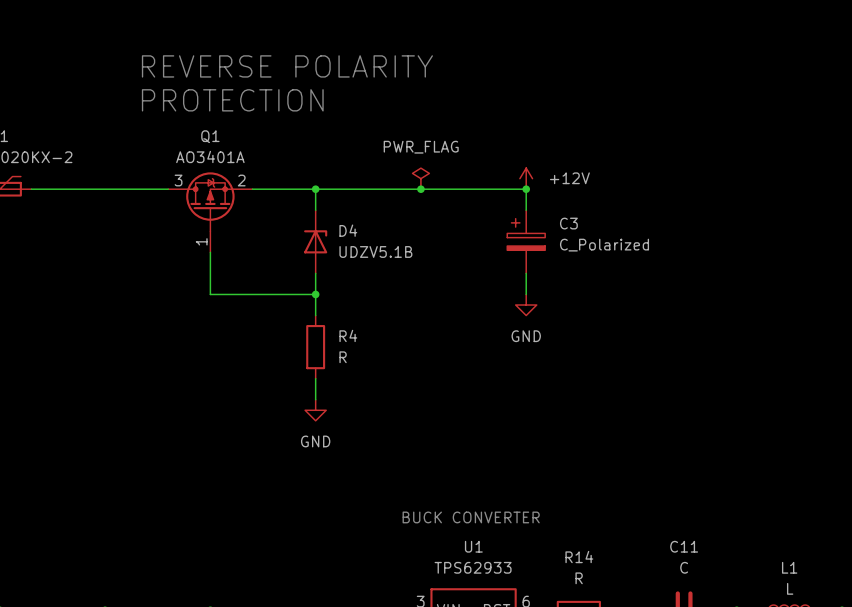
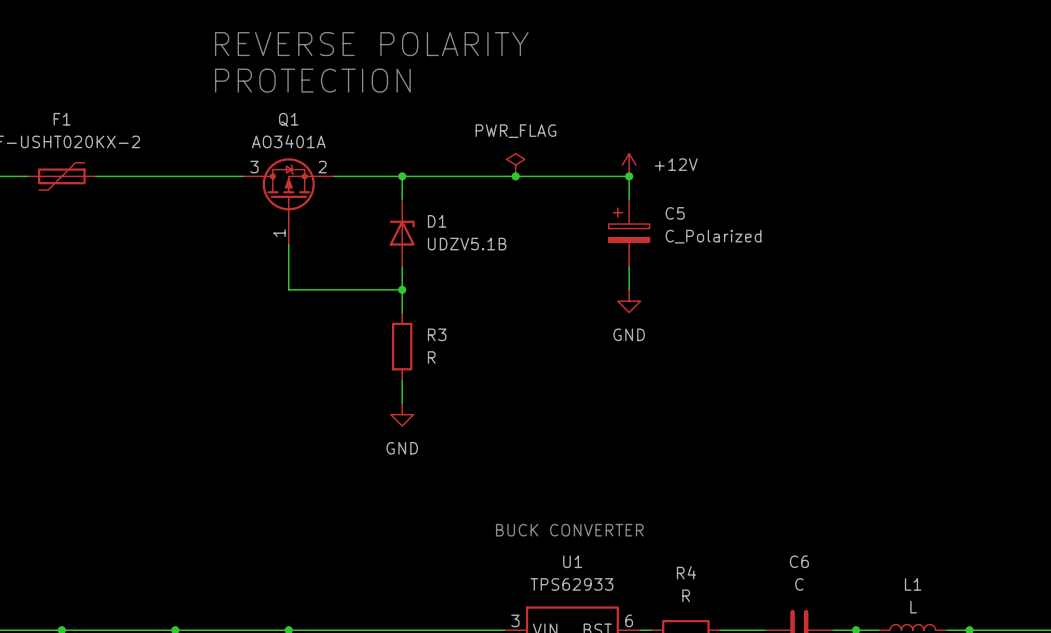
C3 name: C3 (568, 223) -> C5 (675, 213)
D4 name: D4 (348, 230) -> D1 (437, 221)
R4 name: R4 (348, 335) -> R3 (437, 334)
C11 name: C11 (684, 546) -> C6 (799, 561)
R14 name: R14 (579, 557) -> R4 (686, 572)

